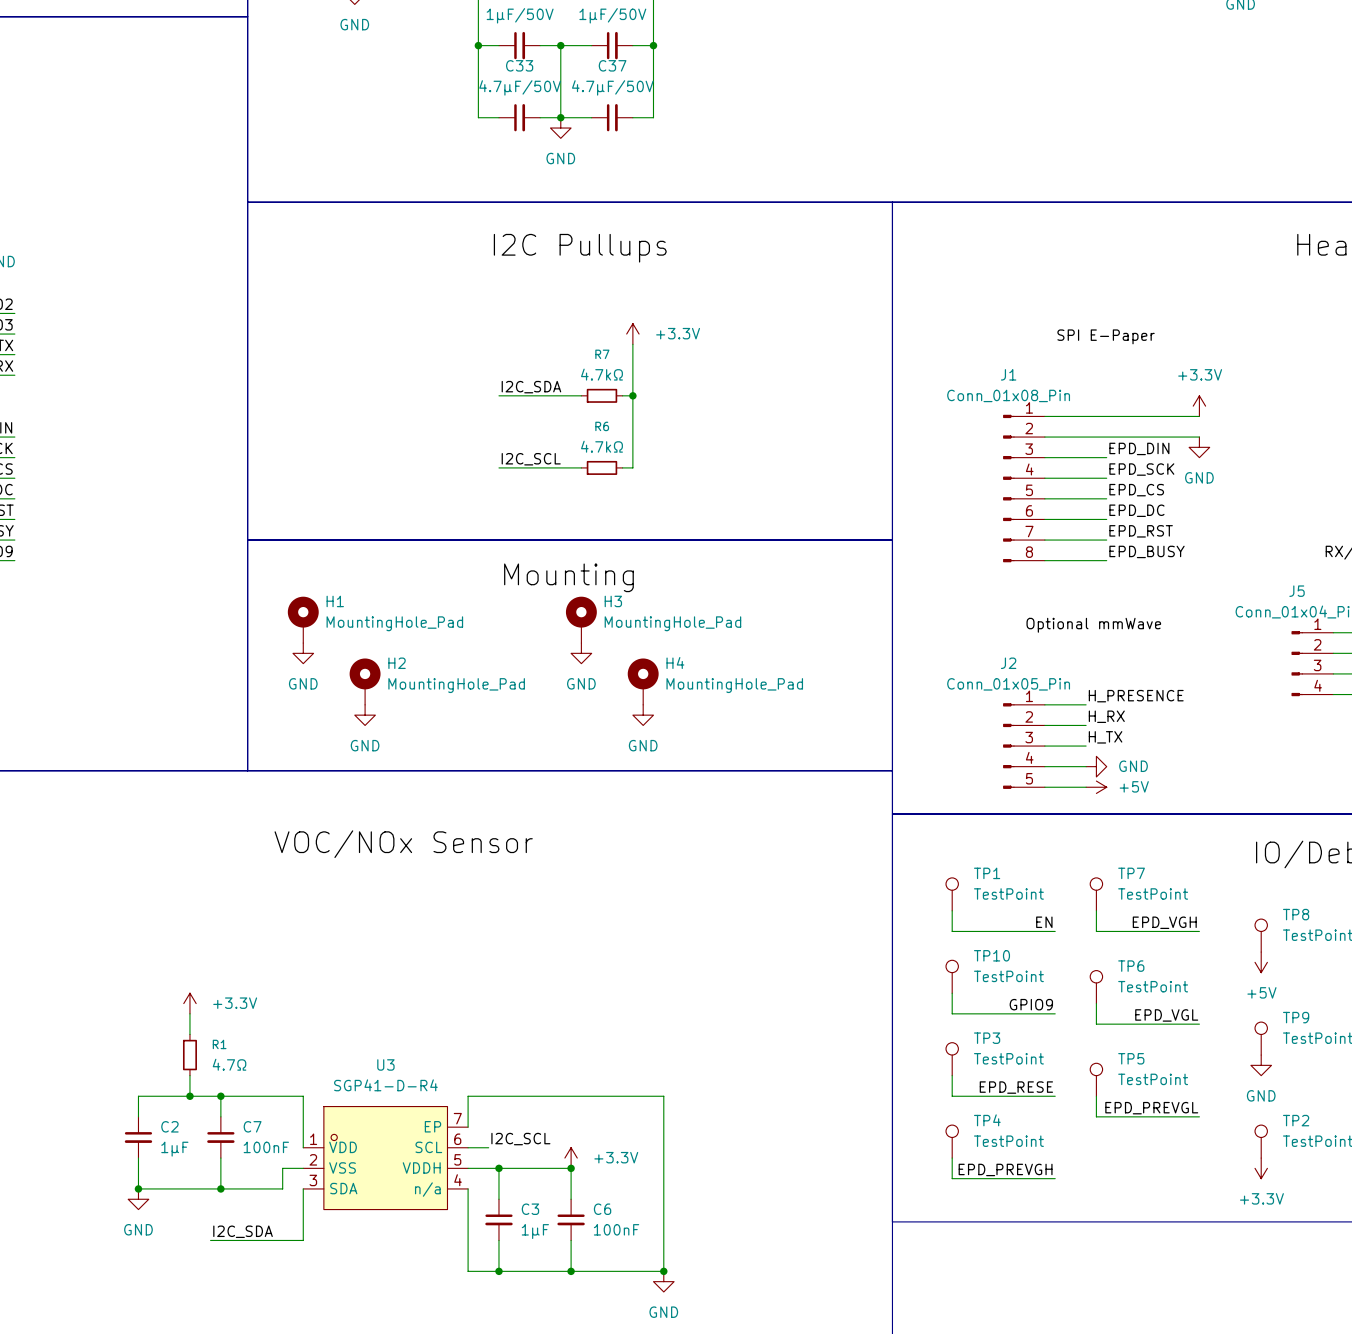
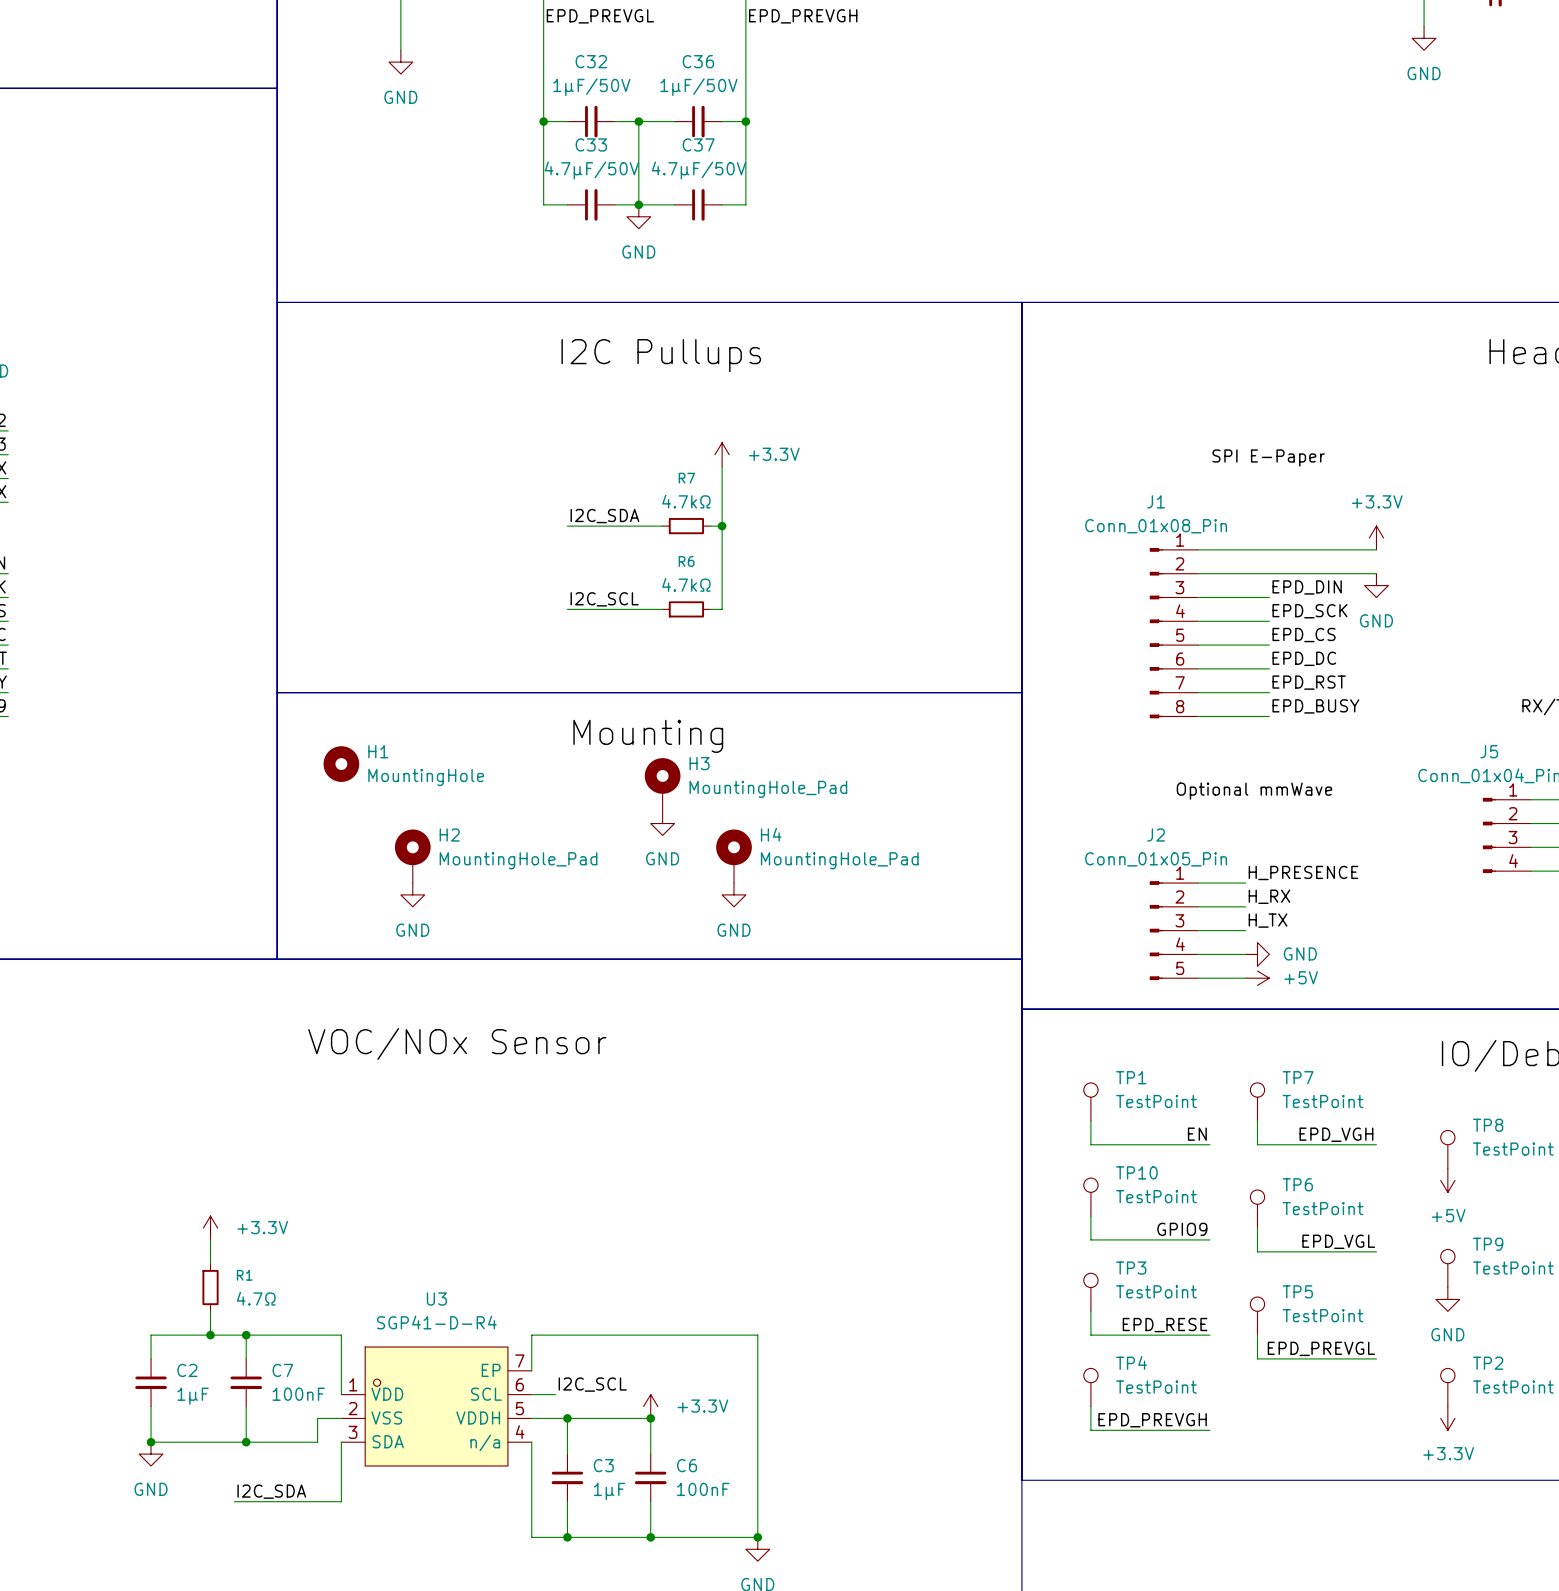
H1 symbol: [287, 596, 319, 644] -> [323, 746, 360, 782]
H1 value: MountingHole_Pad (394, 623) -> MountingHole (426, 777)
power symbol: GND (303, 653) -> none

